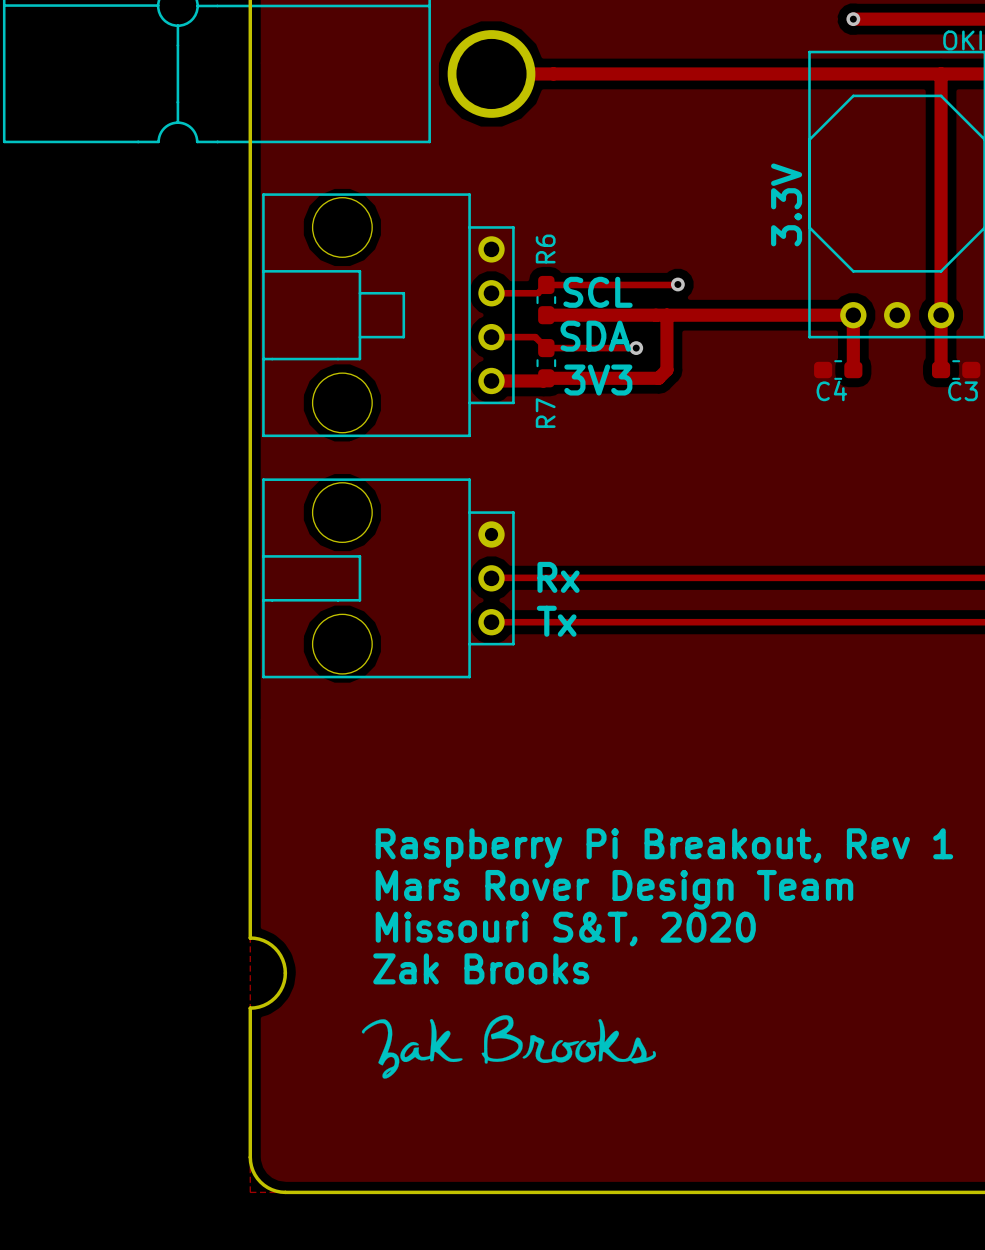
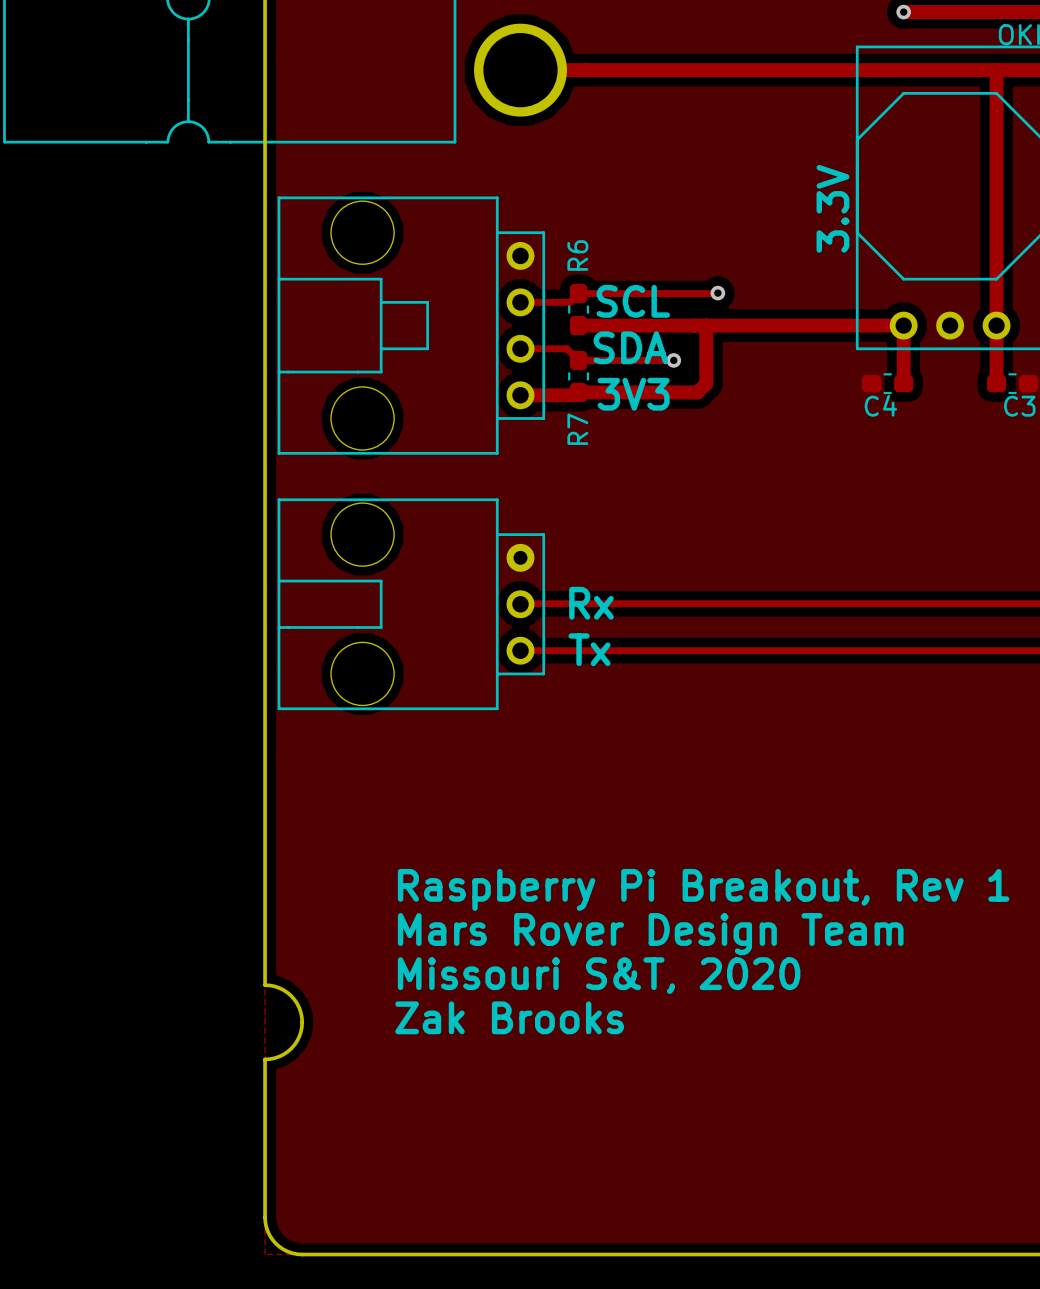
drawing: [361, 1015, 657, 1079] -> none

